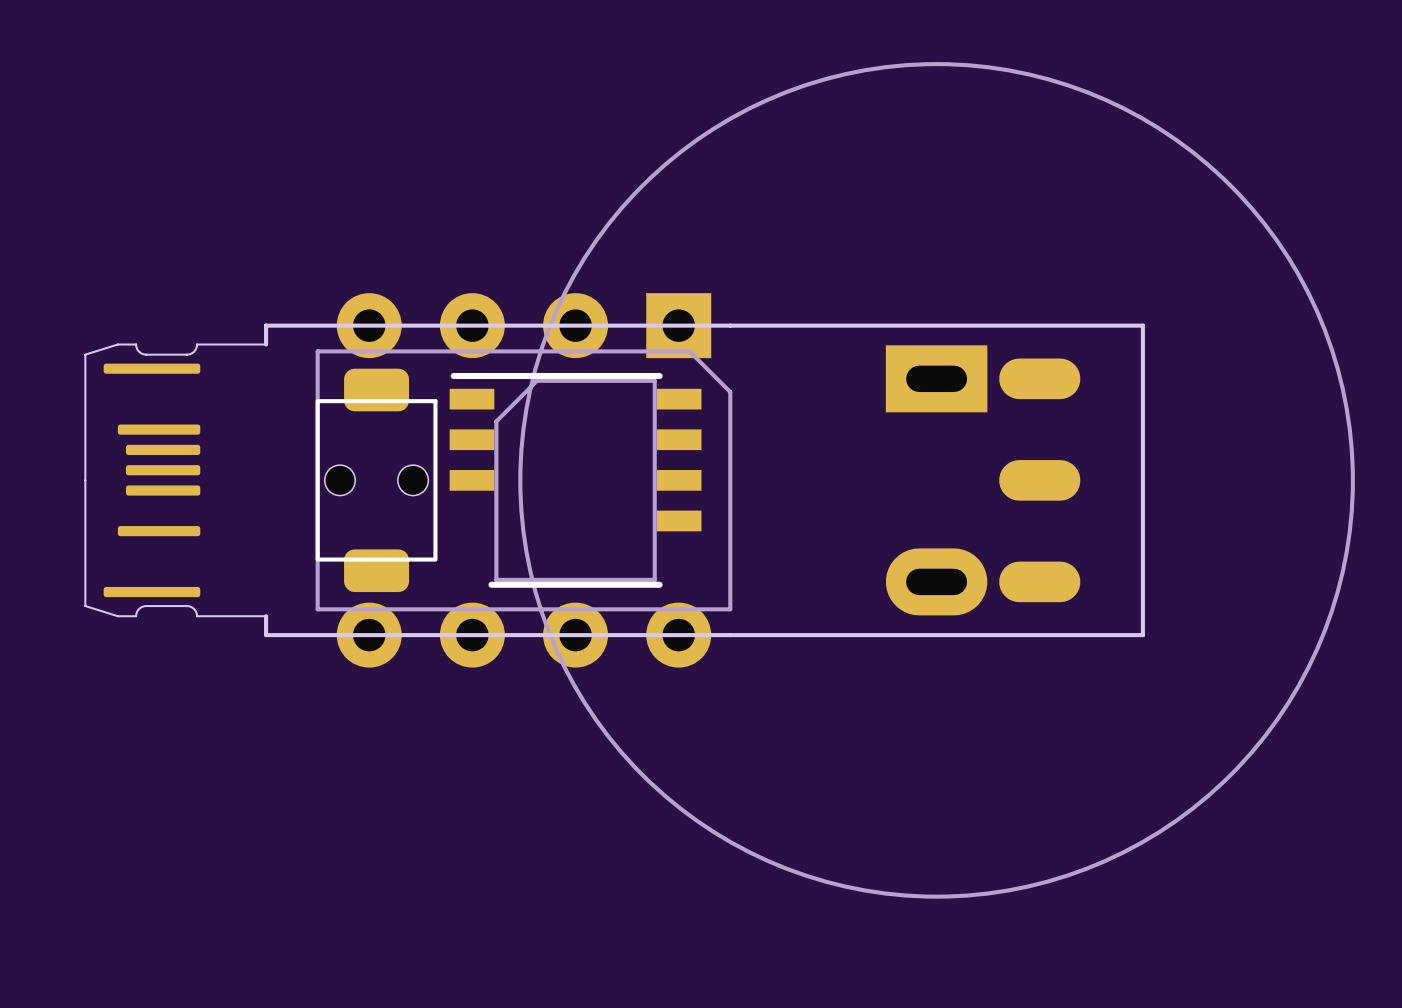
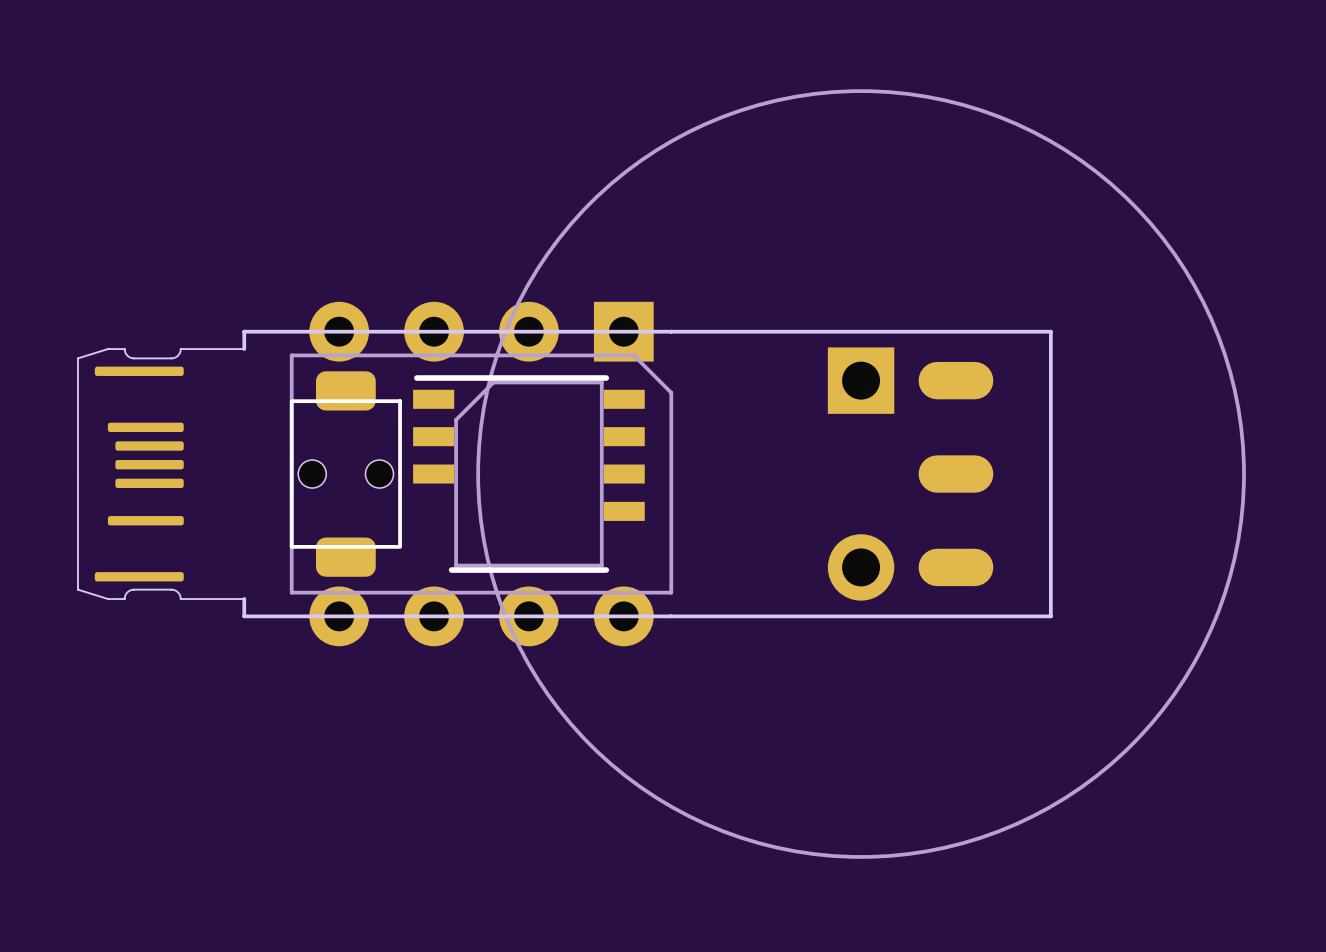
part footprint: [518, 62, 1355, 899] -> [476, 89, 1246, 859]

